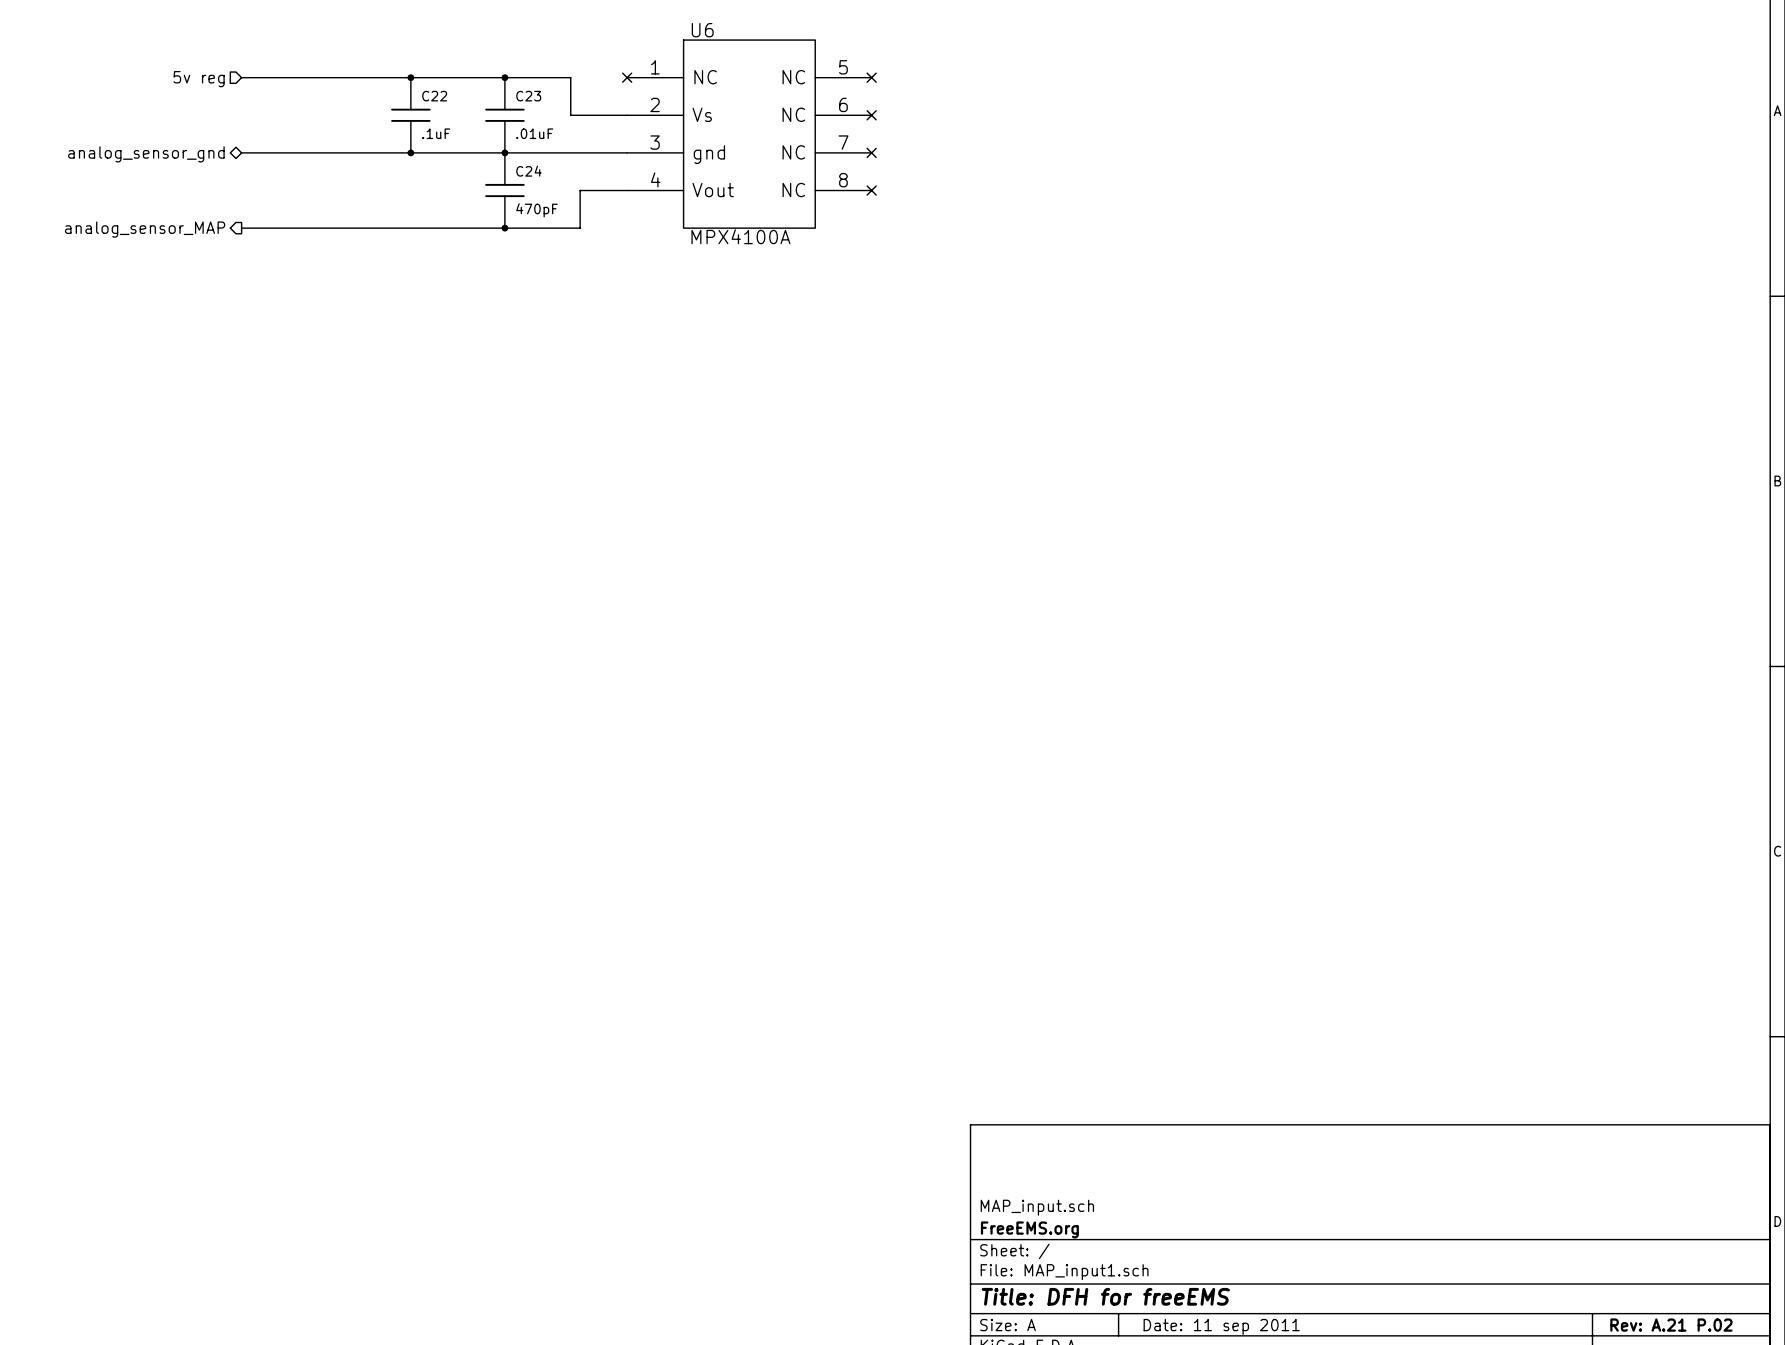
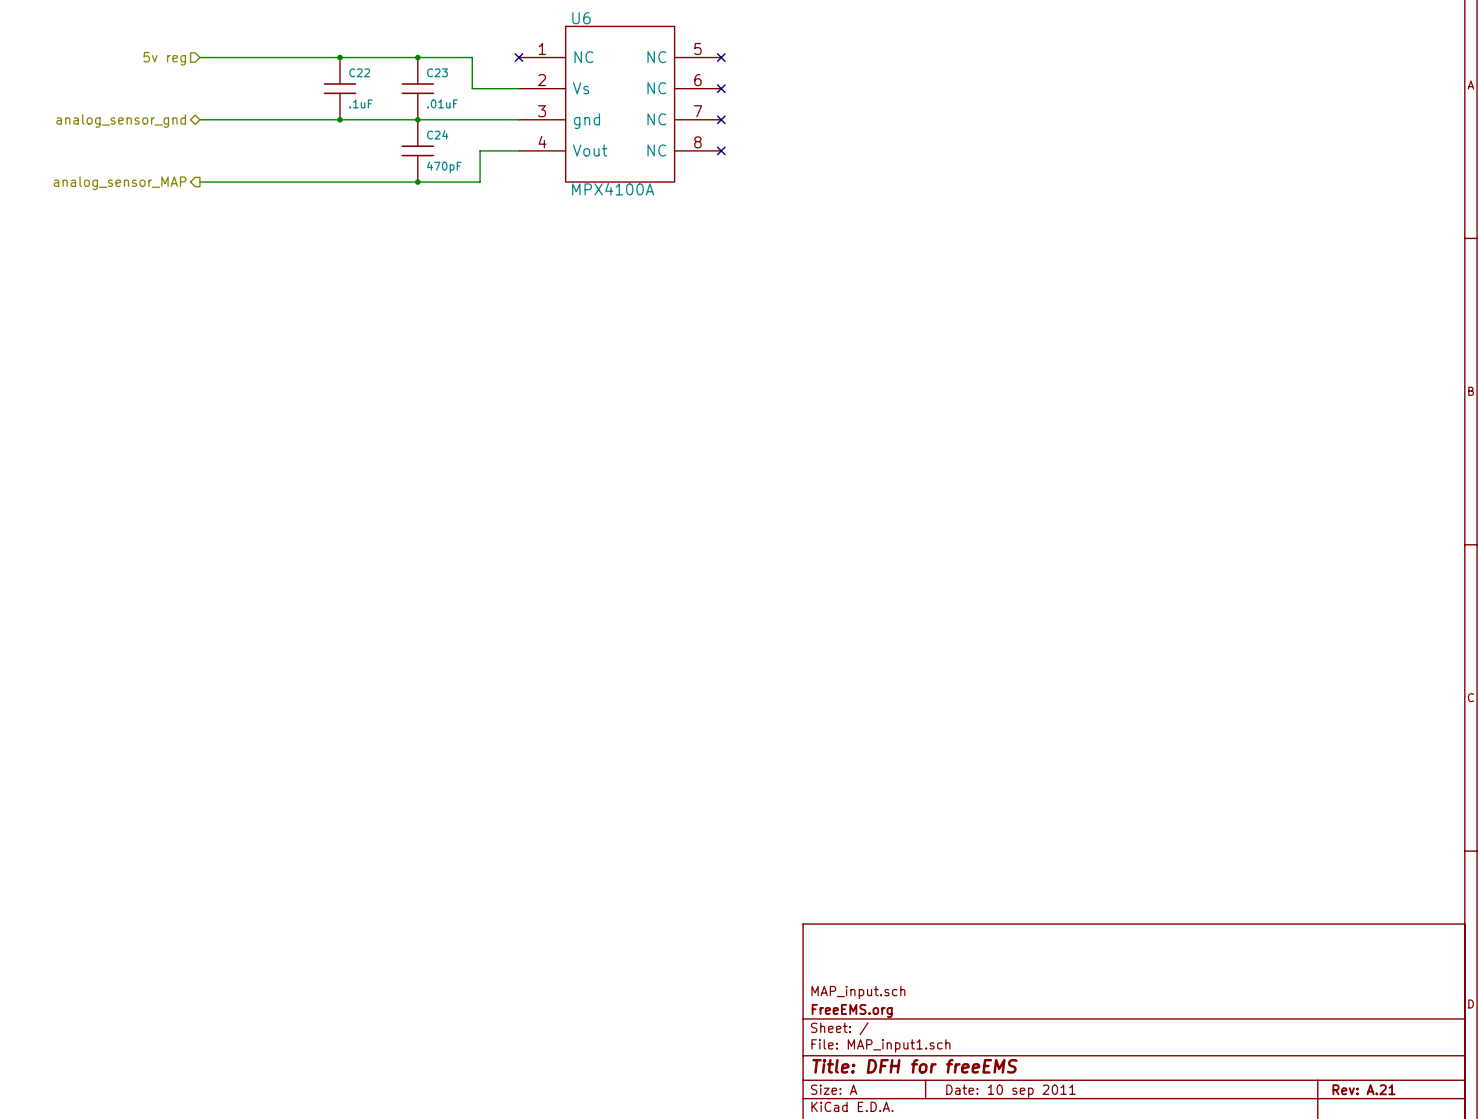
title block: Rev: A.21 P.02 (1671, 1325) -> Rev: A.21 (1364, 1089)
title block: Date: 11 sep 2011 (1221, 1326) -> Date: 10 sep 2011 (1010, 1091)

